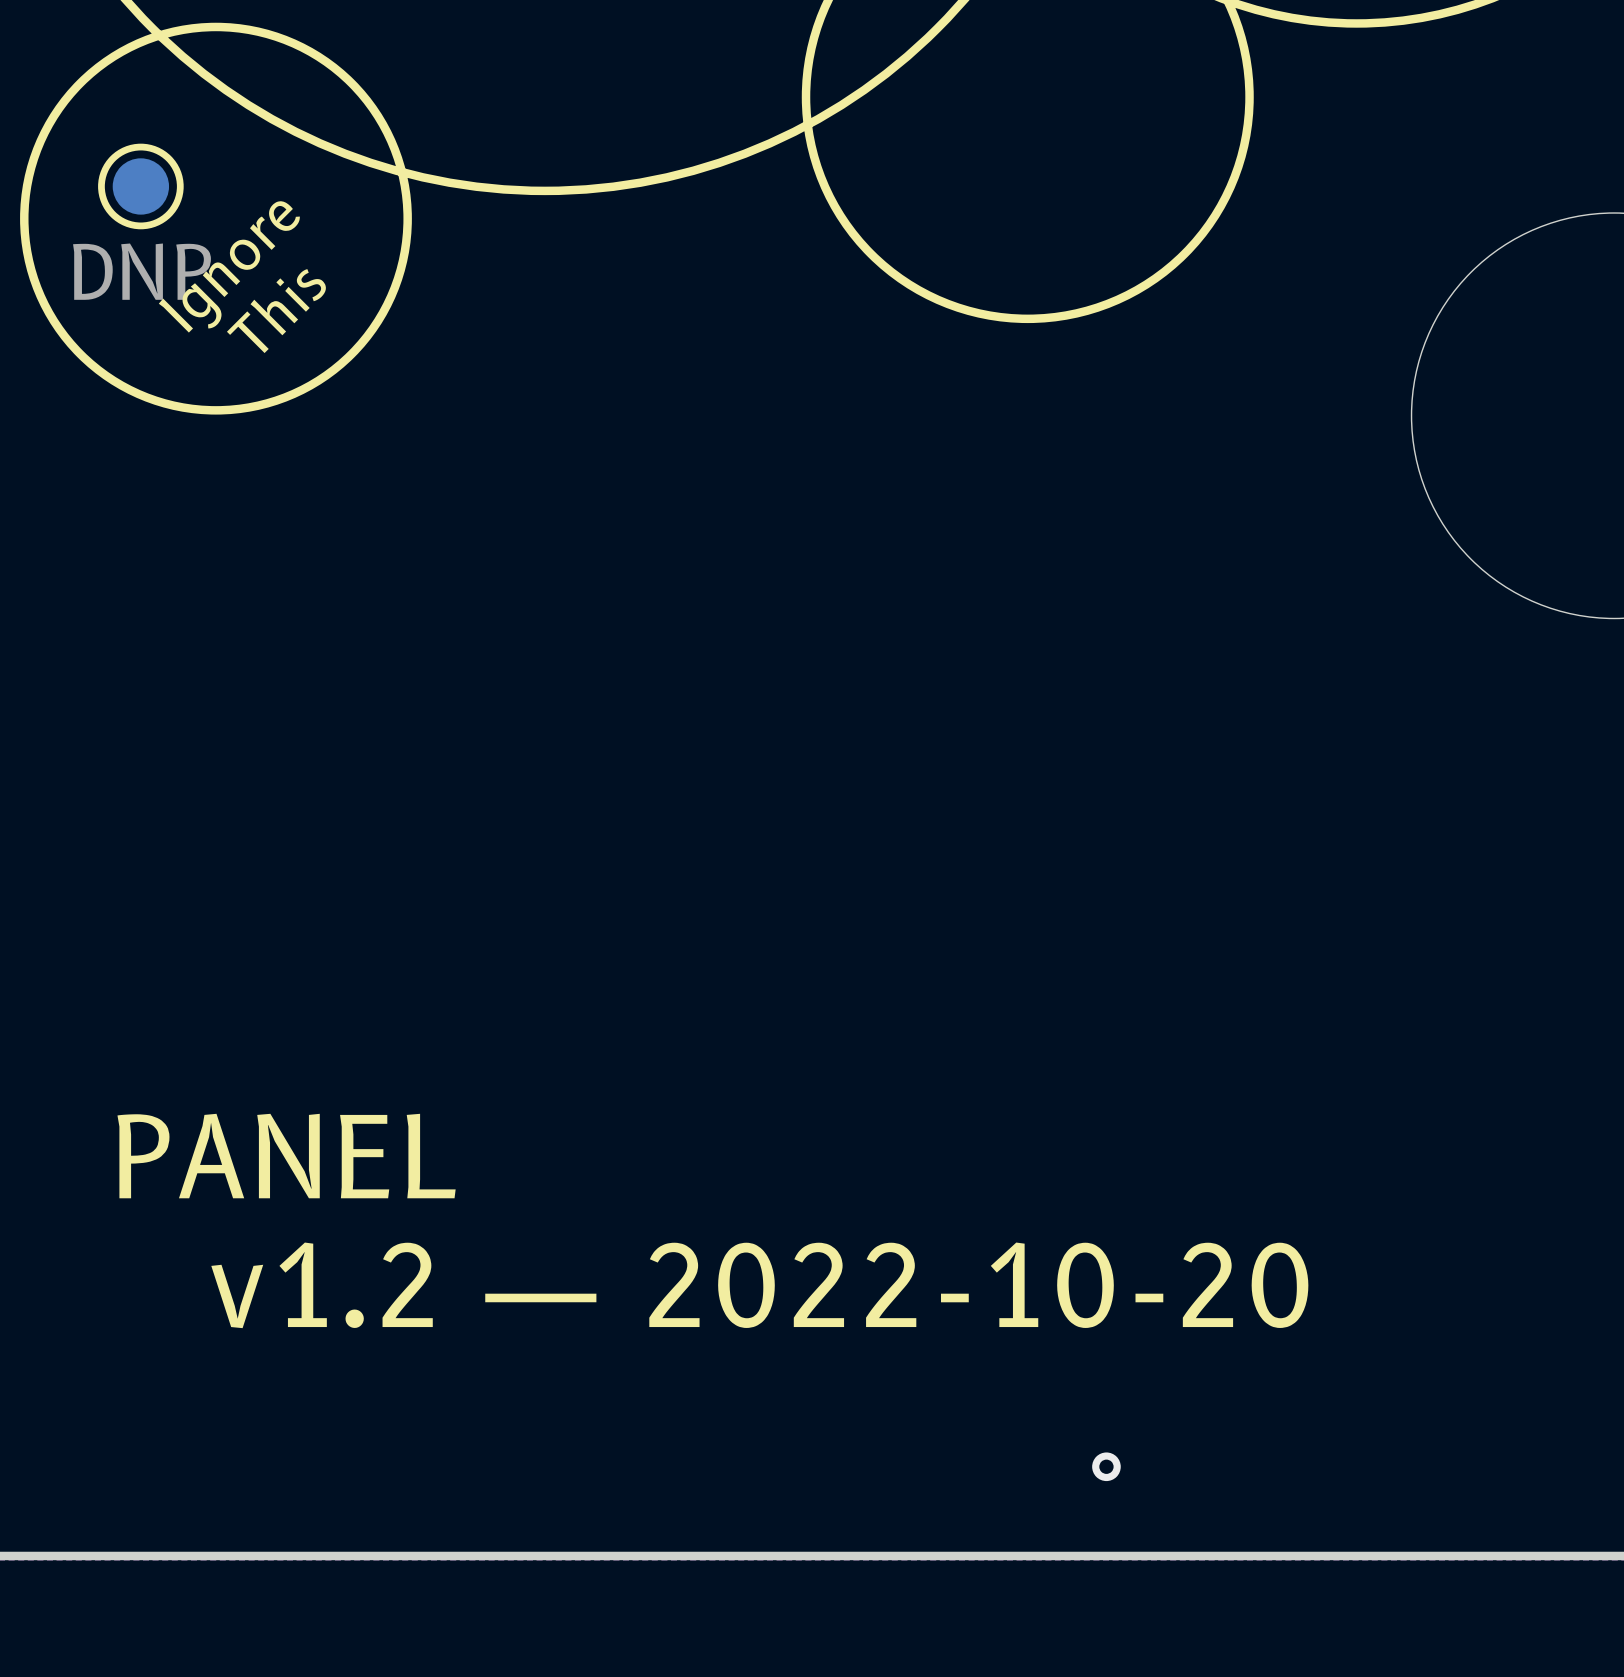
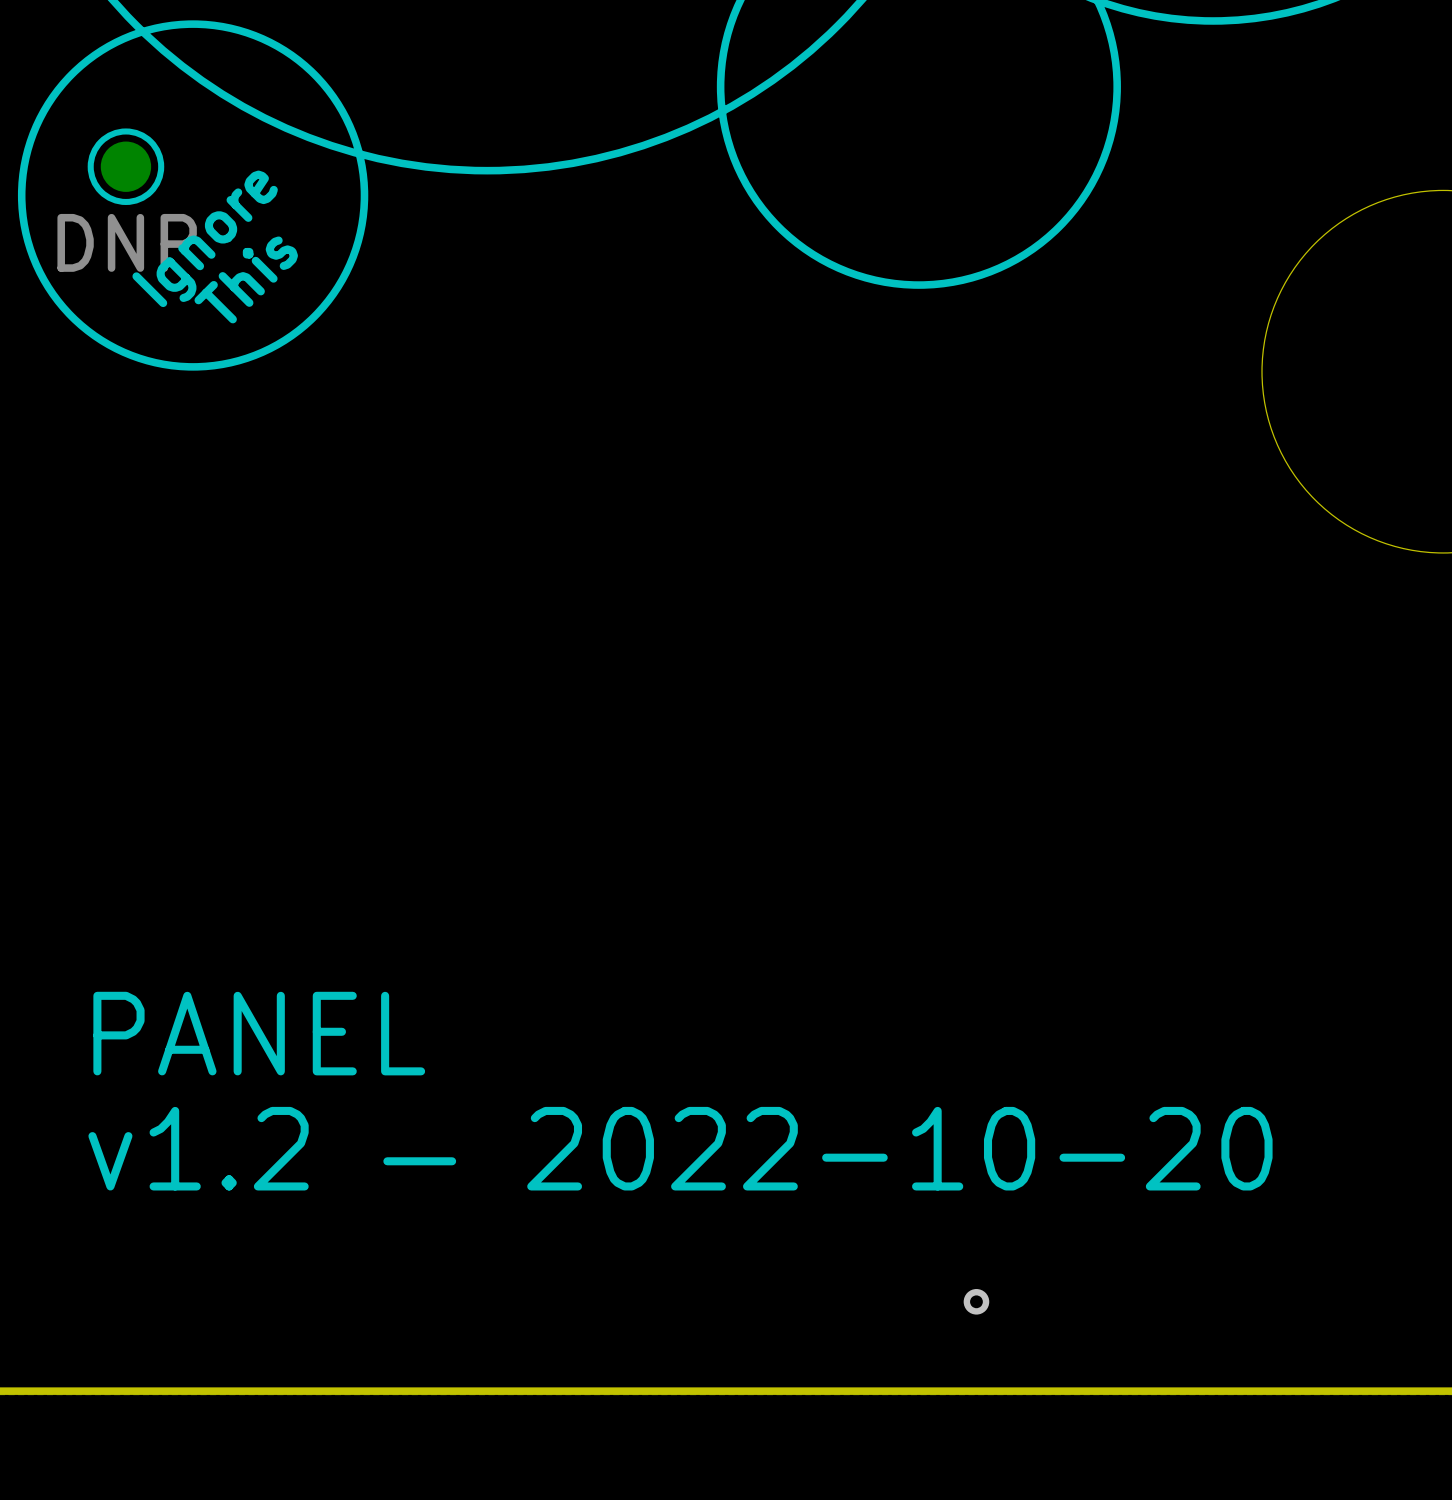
via position: (1106, 1466) -> (976, 1301)

